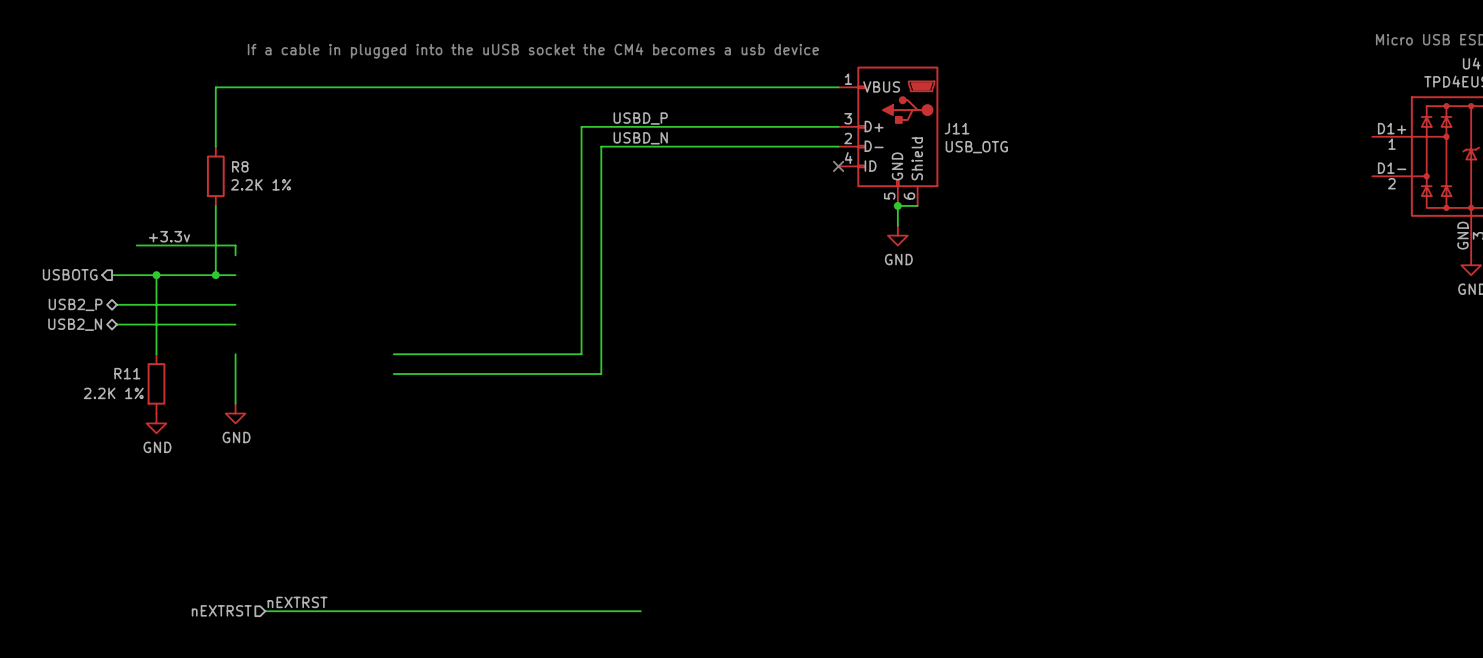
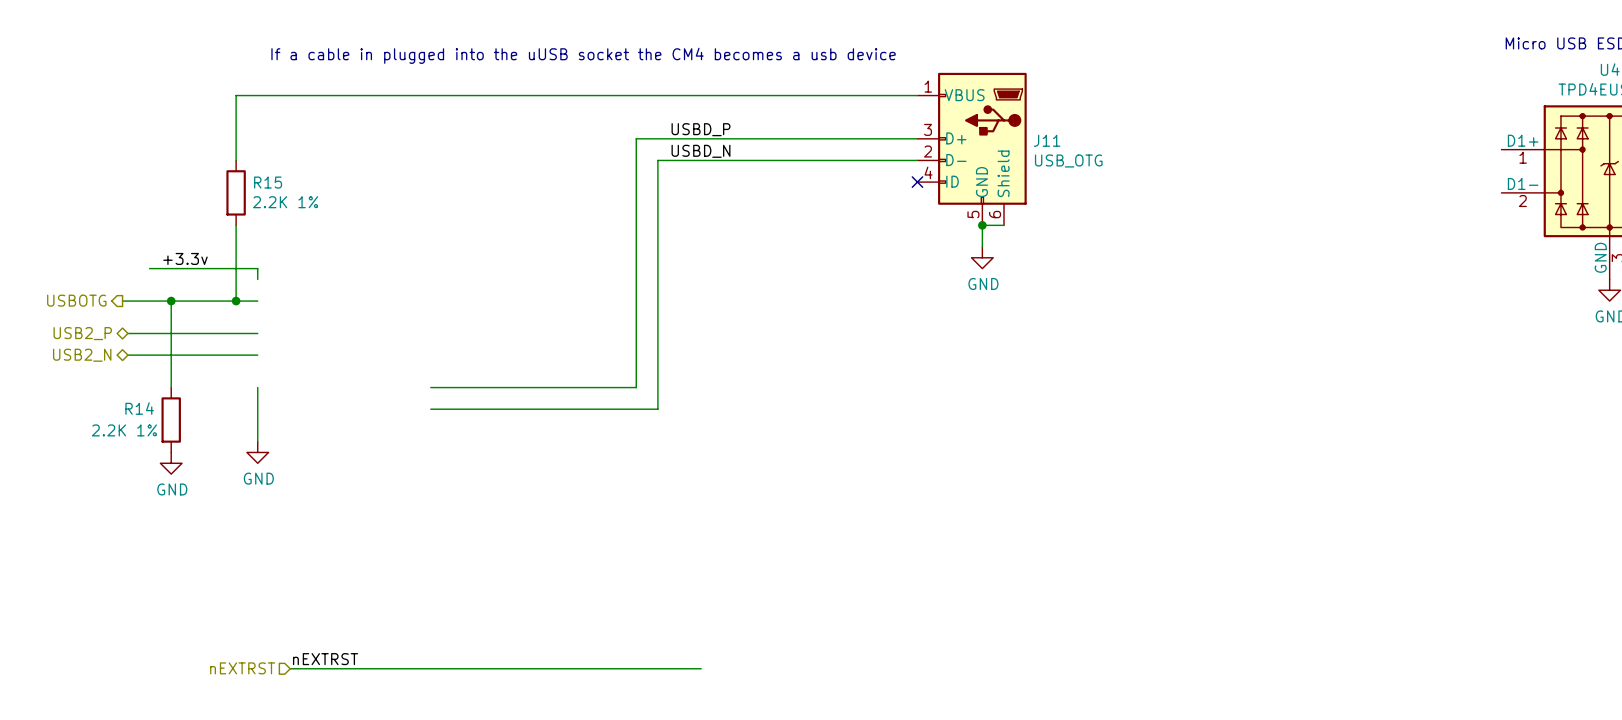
R8 name: R8 (240, 166) -> R15 (268, 182)
R11 name: R11 (127, 373) -> R14 (139, 408)

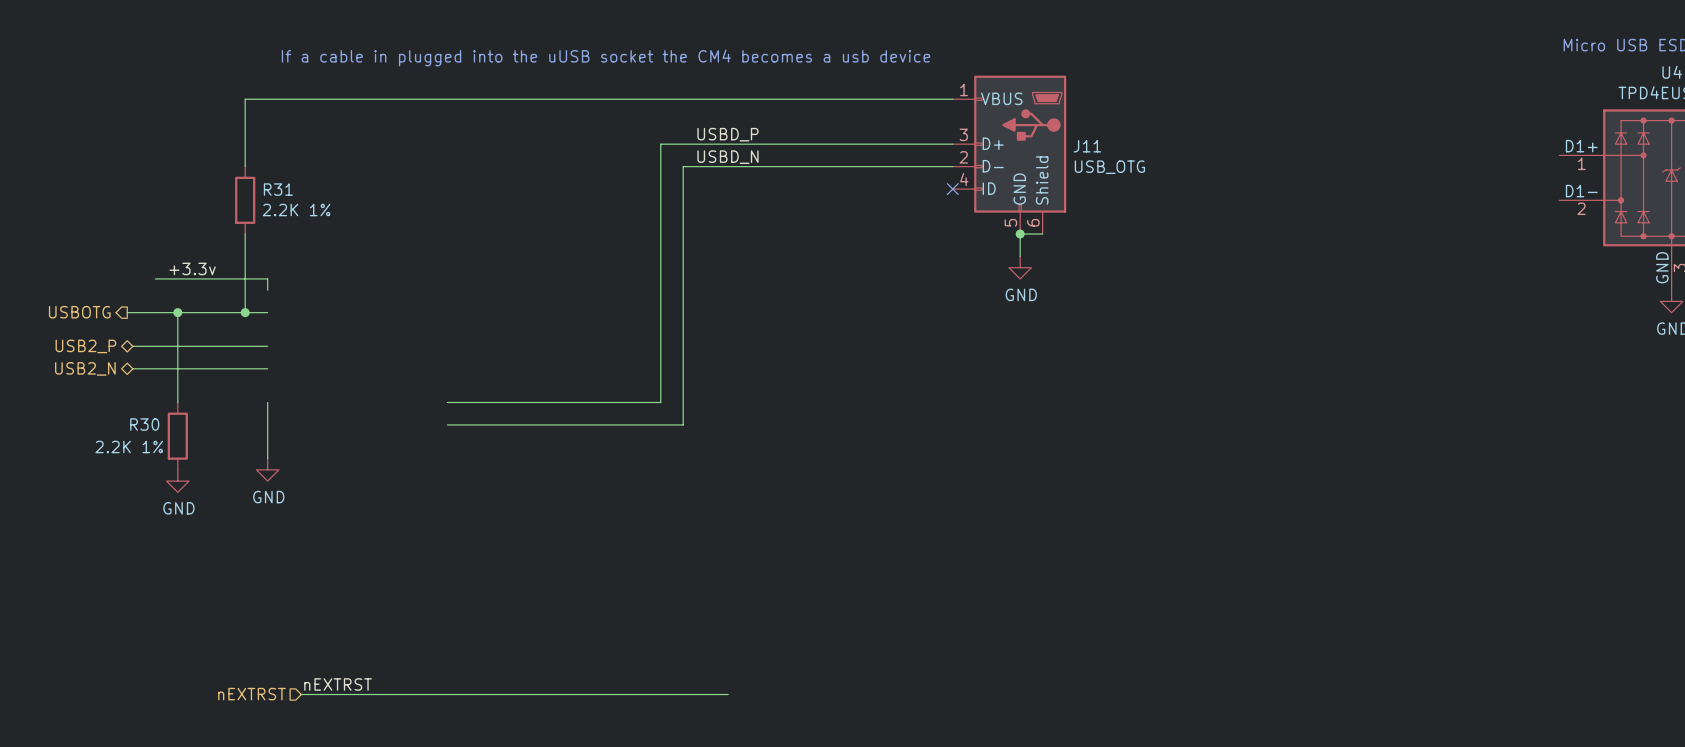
R15 name: R15 (268, 182) -> R31 (278, 189)
R14 name: R14 (139, 408) -> R30 (144, 424)

